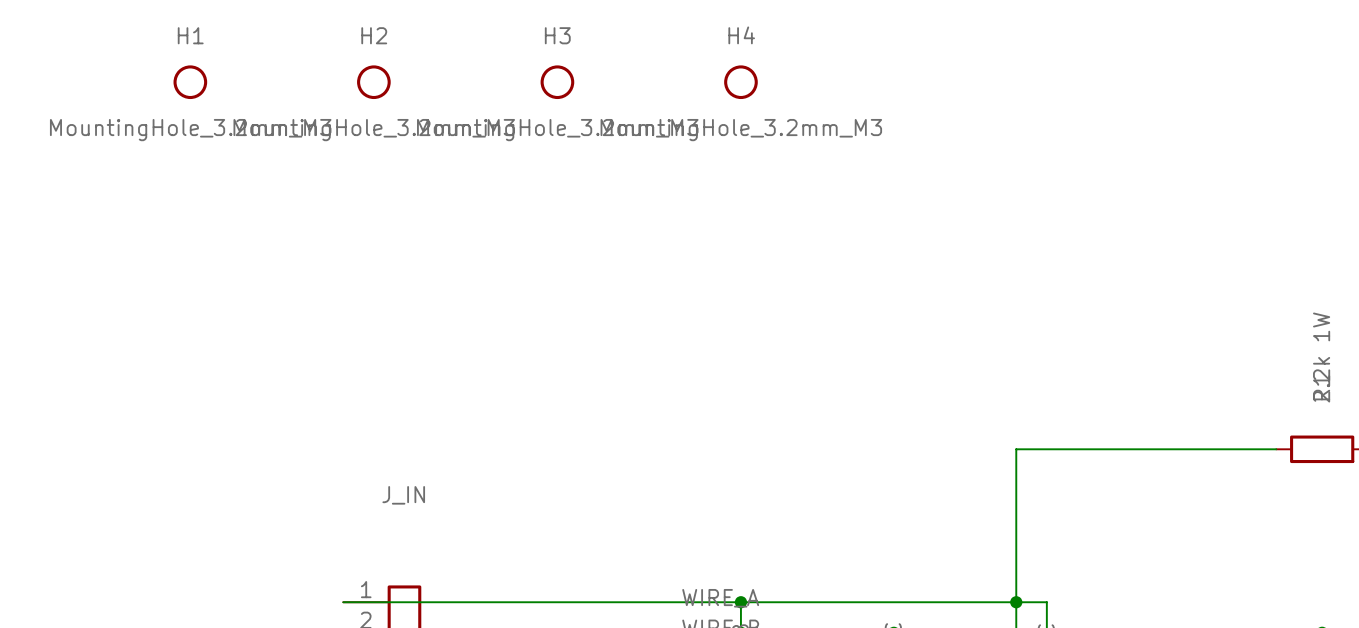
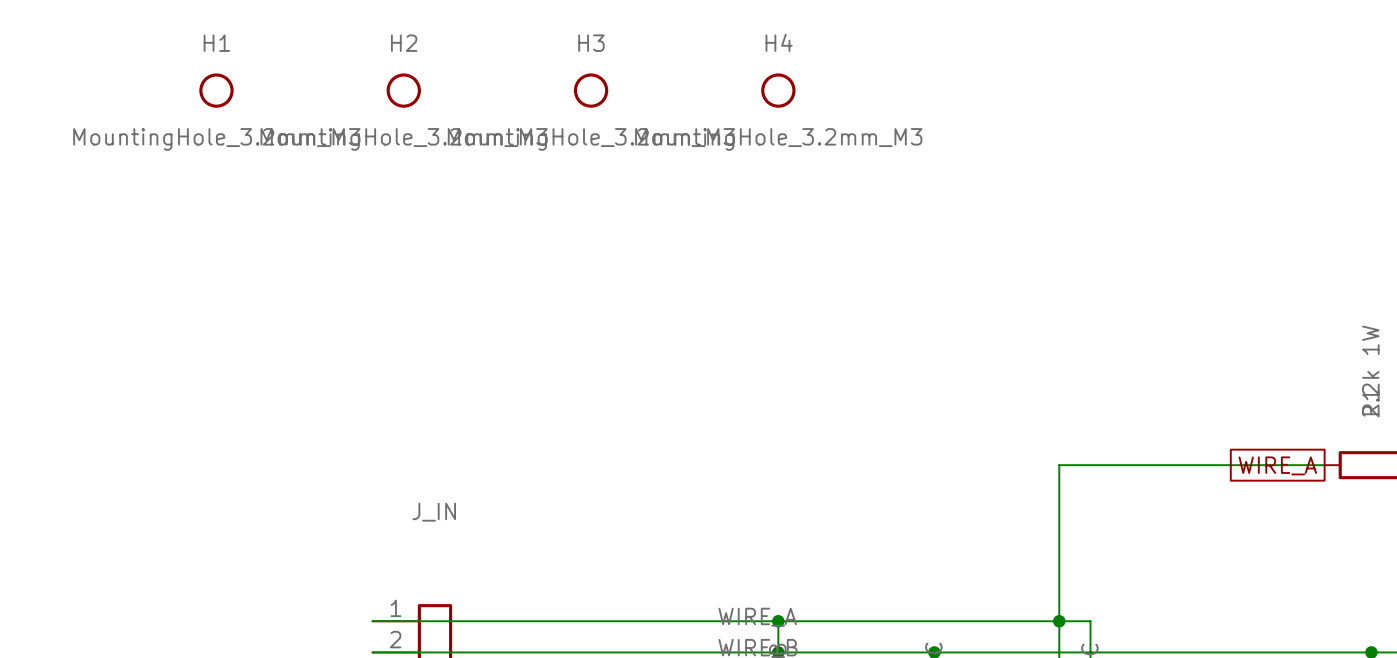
global label: none -> WIRE_A (1277, 465)

